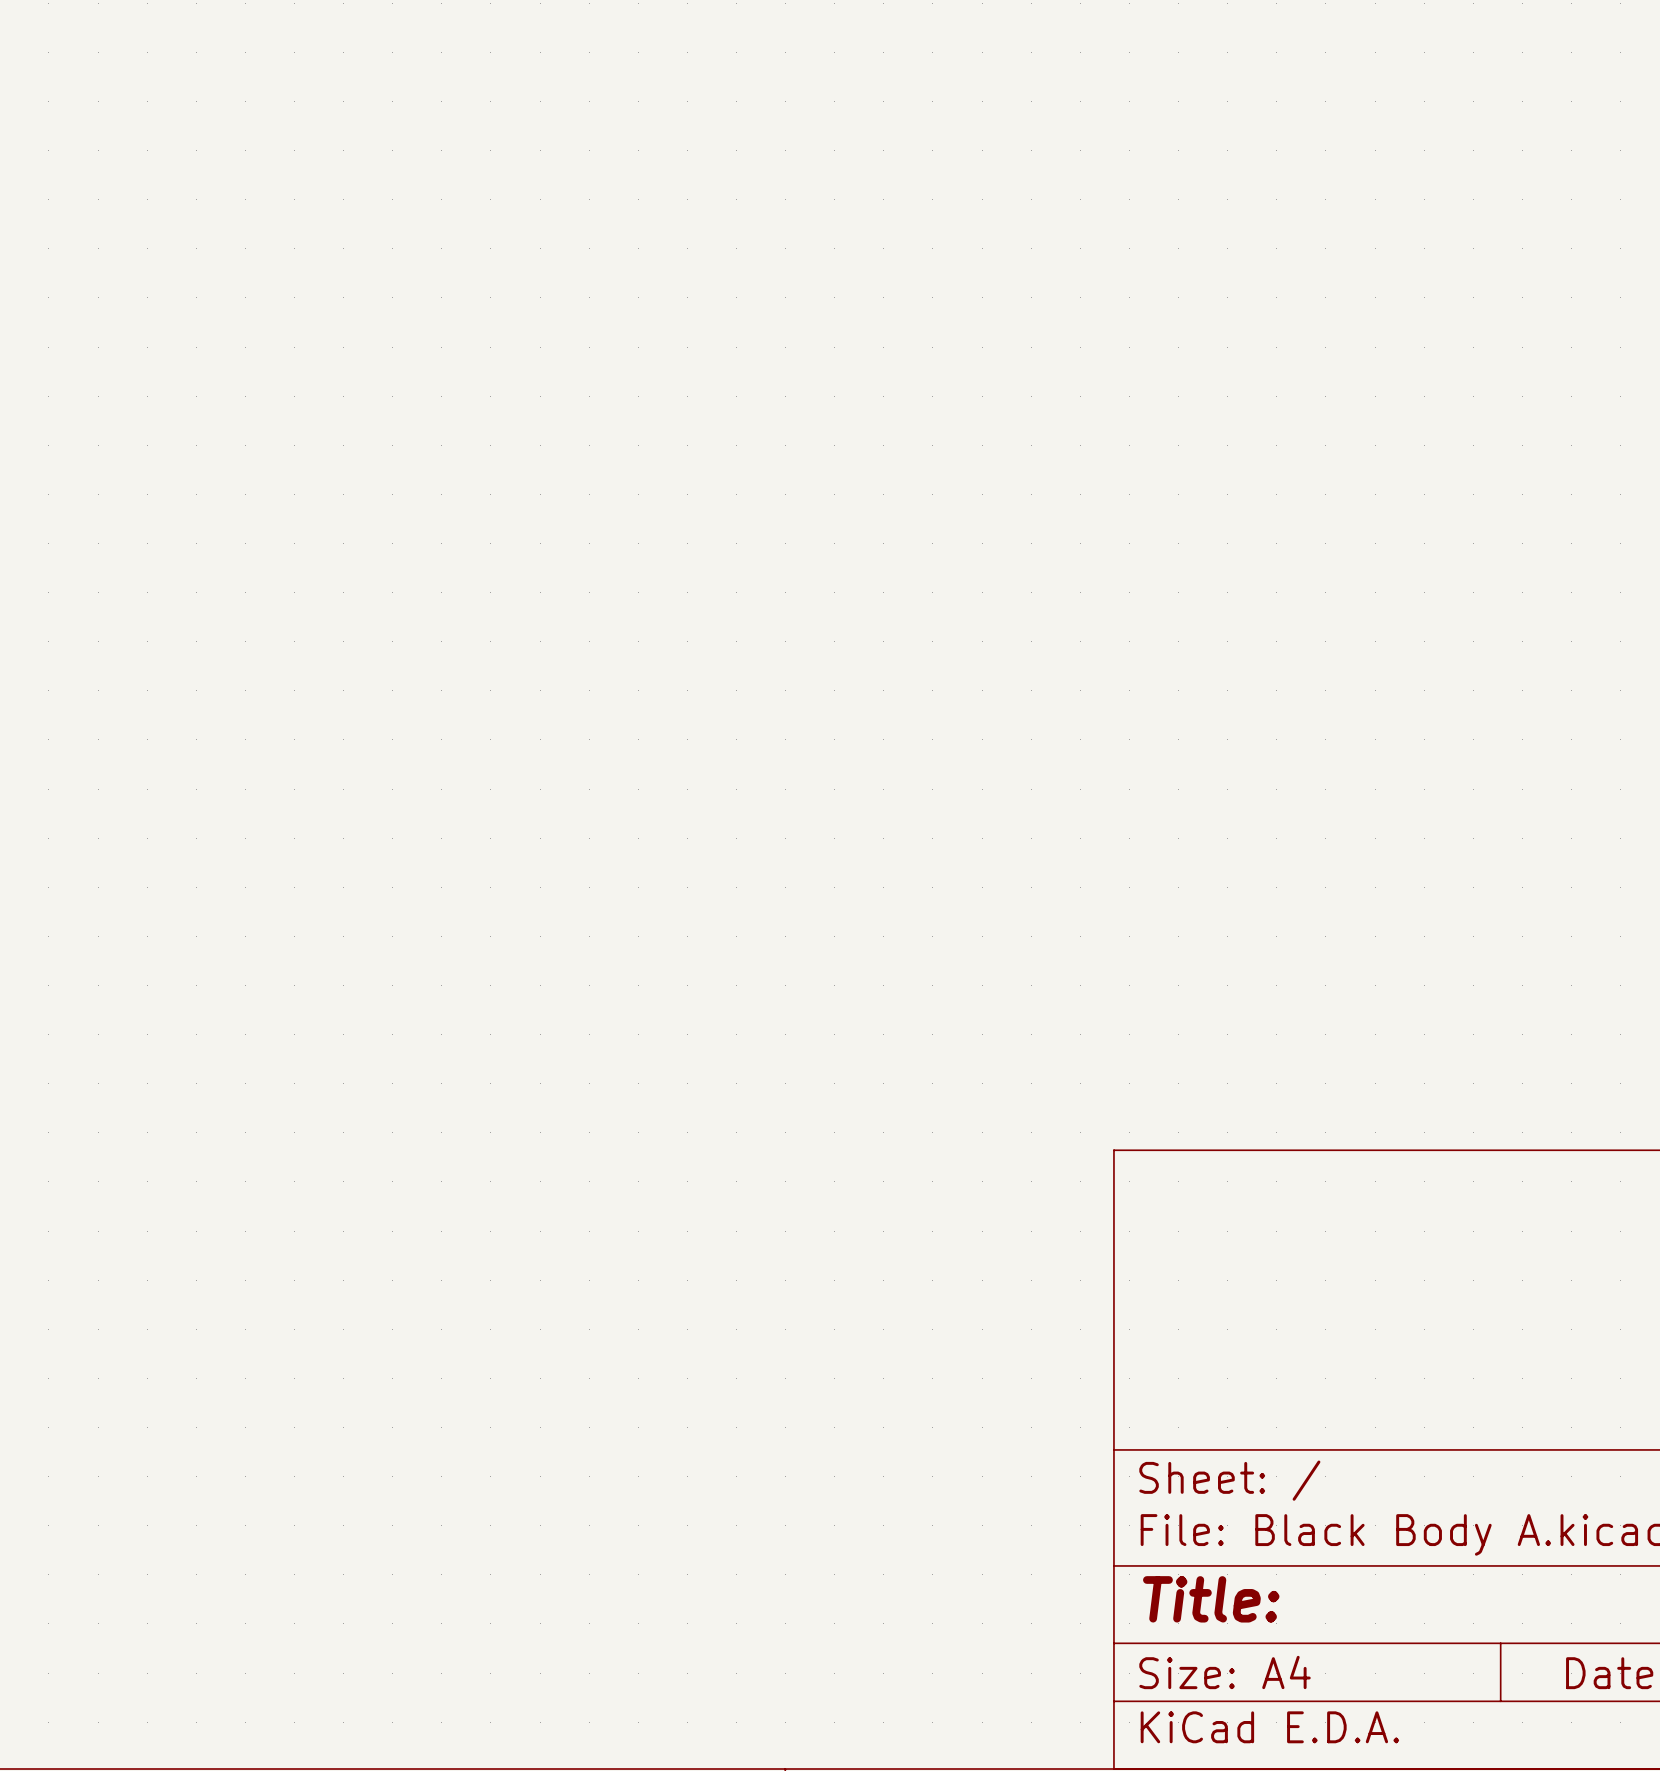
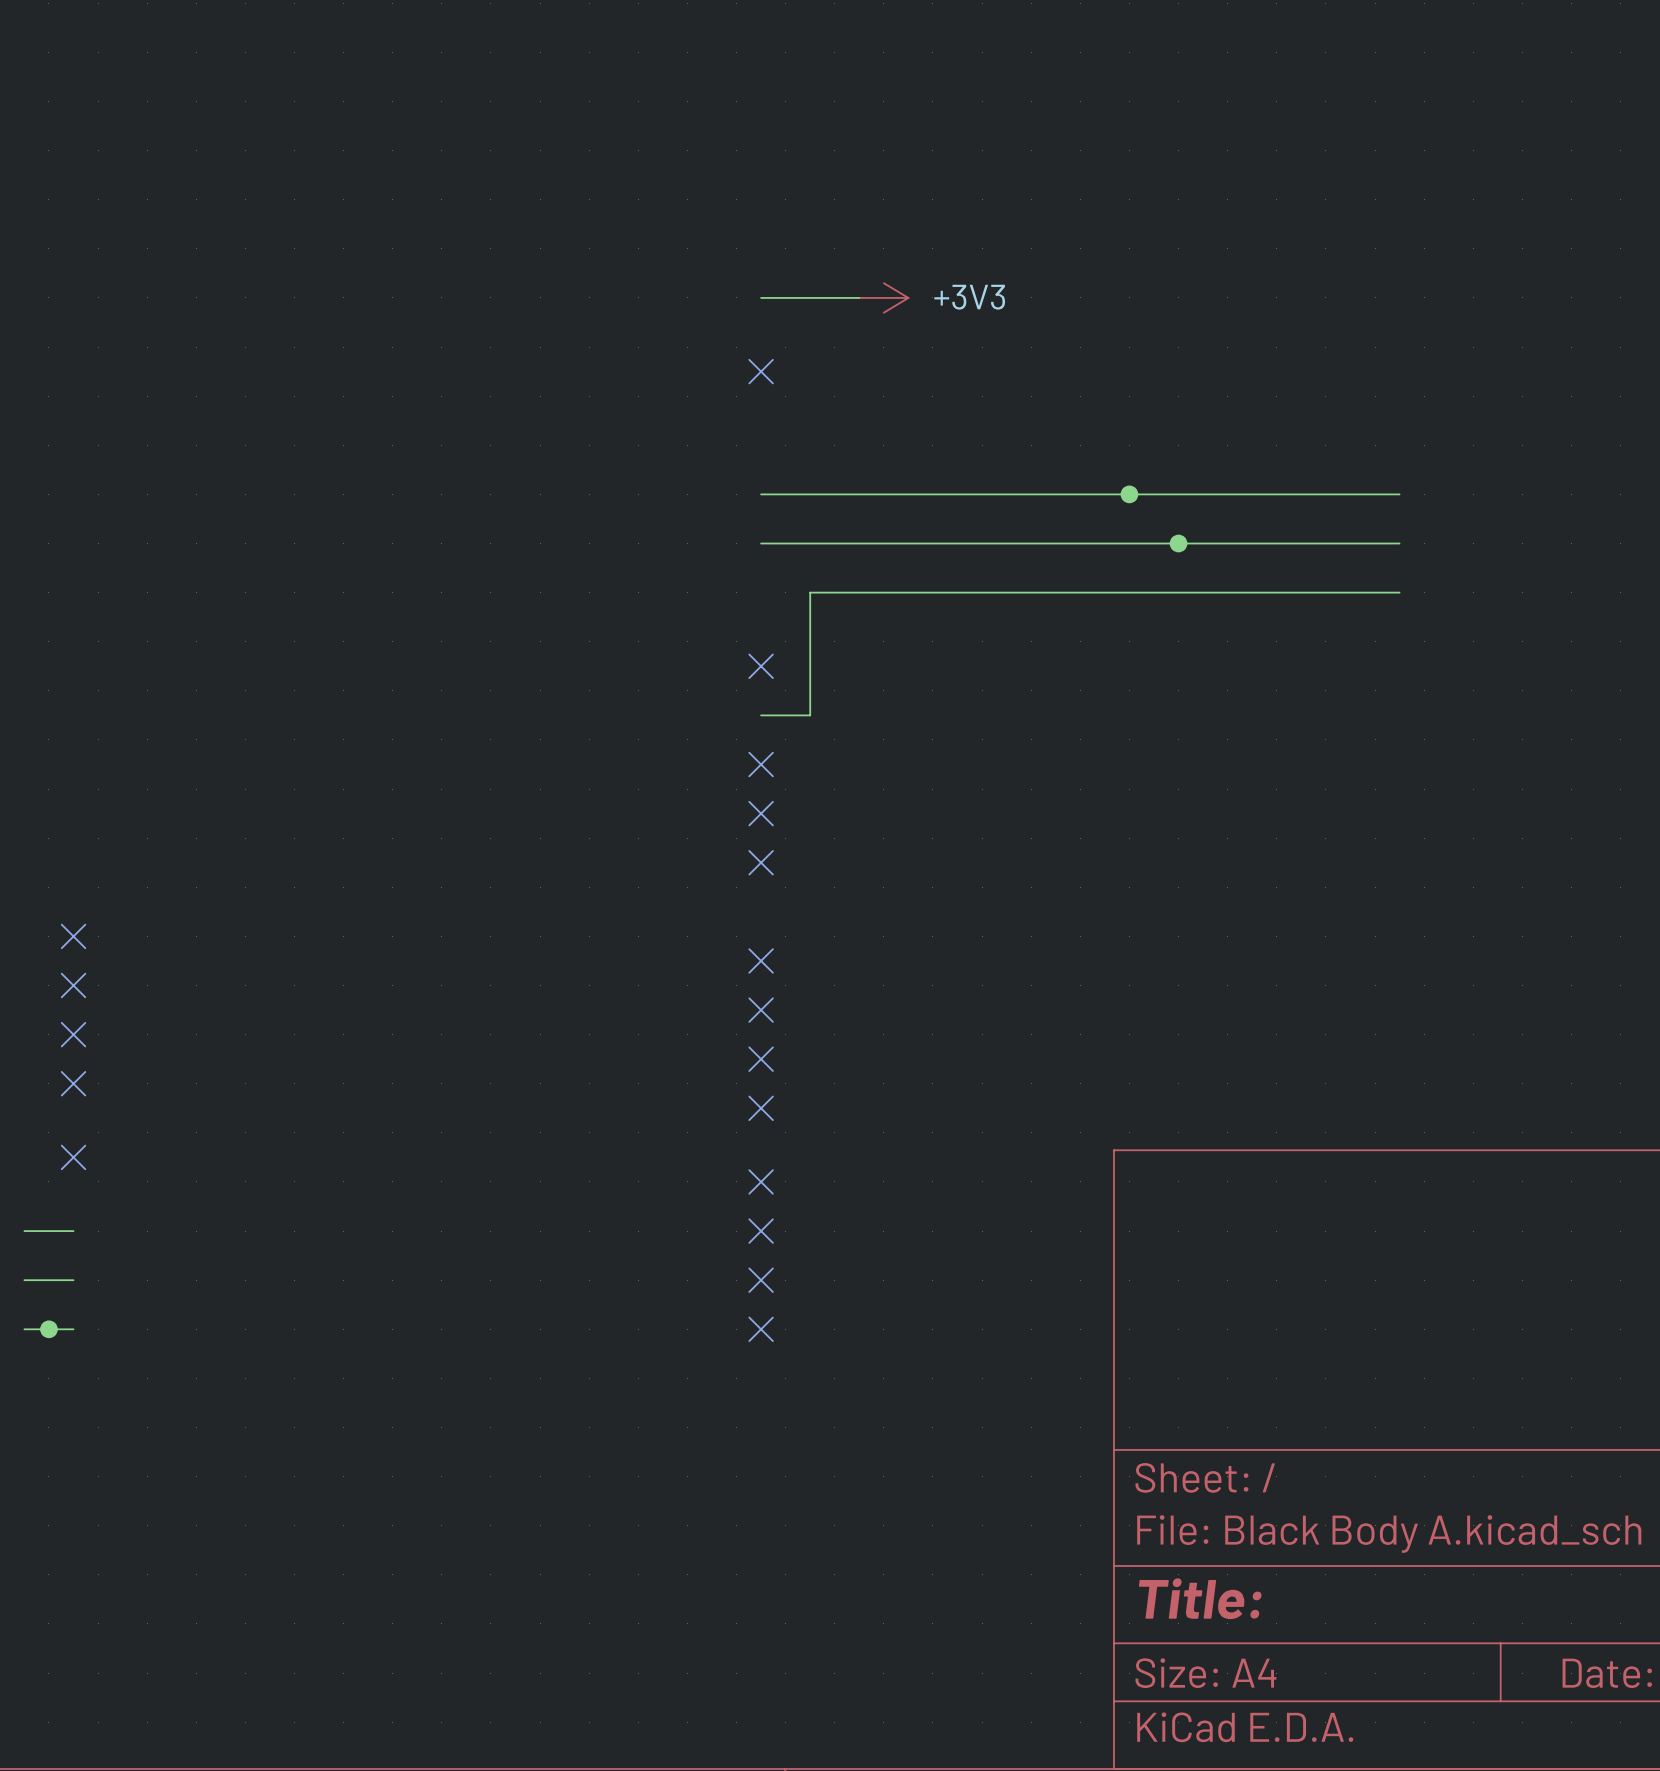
wire: none -> (761, 297) (859, 297)
power symbol: none -> +3V3 (883, 297)
no-connect mark: none -> (761, 371)
wire: none -> (761, 494) (1399, 494)
junction: none -> (1129, 494)
wire: none -> (761, 543) (1399, 543)
junction: none -> (1178, 543)
wire: none -> (1399, 592) (810, 592) (810, 715) (761, 715)
no-connect mark: none -> (761, 666)
no-connect mark: none -> (761, 764)
no-connect mark: none -> (761, 813)
no-connect mark: none -> (761, 862)
no-connect mark: none -> (73, 936)
no-connect mark: none -> (761, 960)
no-connect mark: none -> (73, 985)
no-connect mark: none -> (761, 1010)
no-connect mark: none -> (73, 1034)
no-connect mark: none -> (761, 1059)
no-connect mark: none -> (73, 1083)
no-connect mark: none -> (761, 1108)
no-connect mark: none -> (73, 1157)
no-connect mark: none -> (761, 1181)
wire: none -> (24, 1231) (73, 1231)
no-connect mark: none -> (761, 1231)
wire: none -> (24, 1280) (73, 1280)
no-connect mark: none -> (761, 1280)
wire: none -> (24, 1329) (73, 1329)
junction: none -> (48, 1329)
no-connect mark: none -> (761, 1329)

